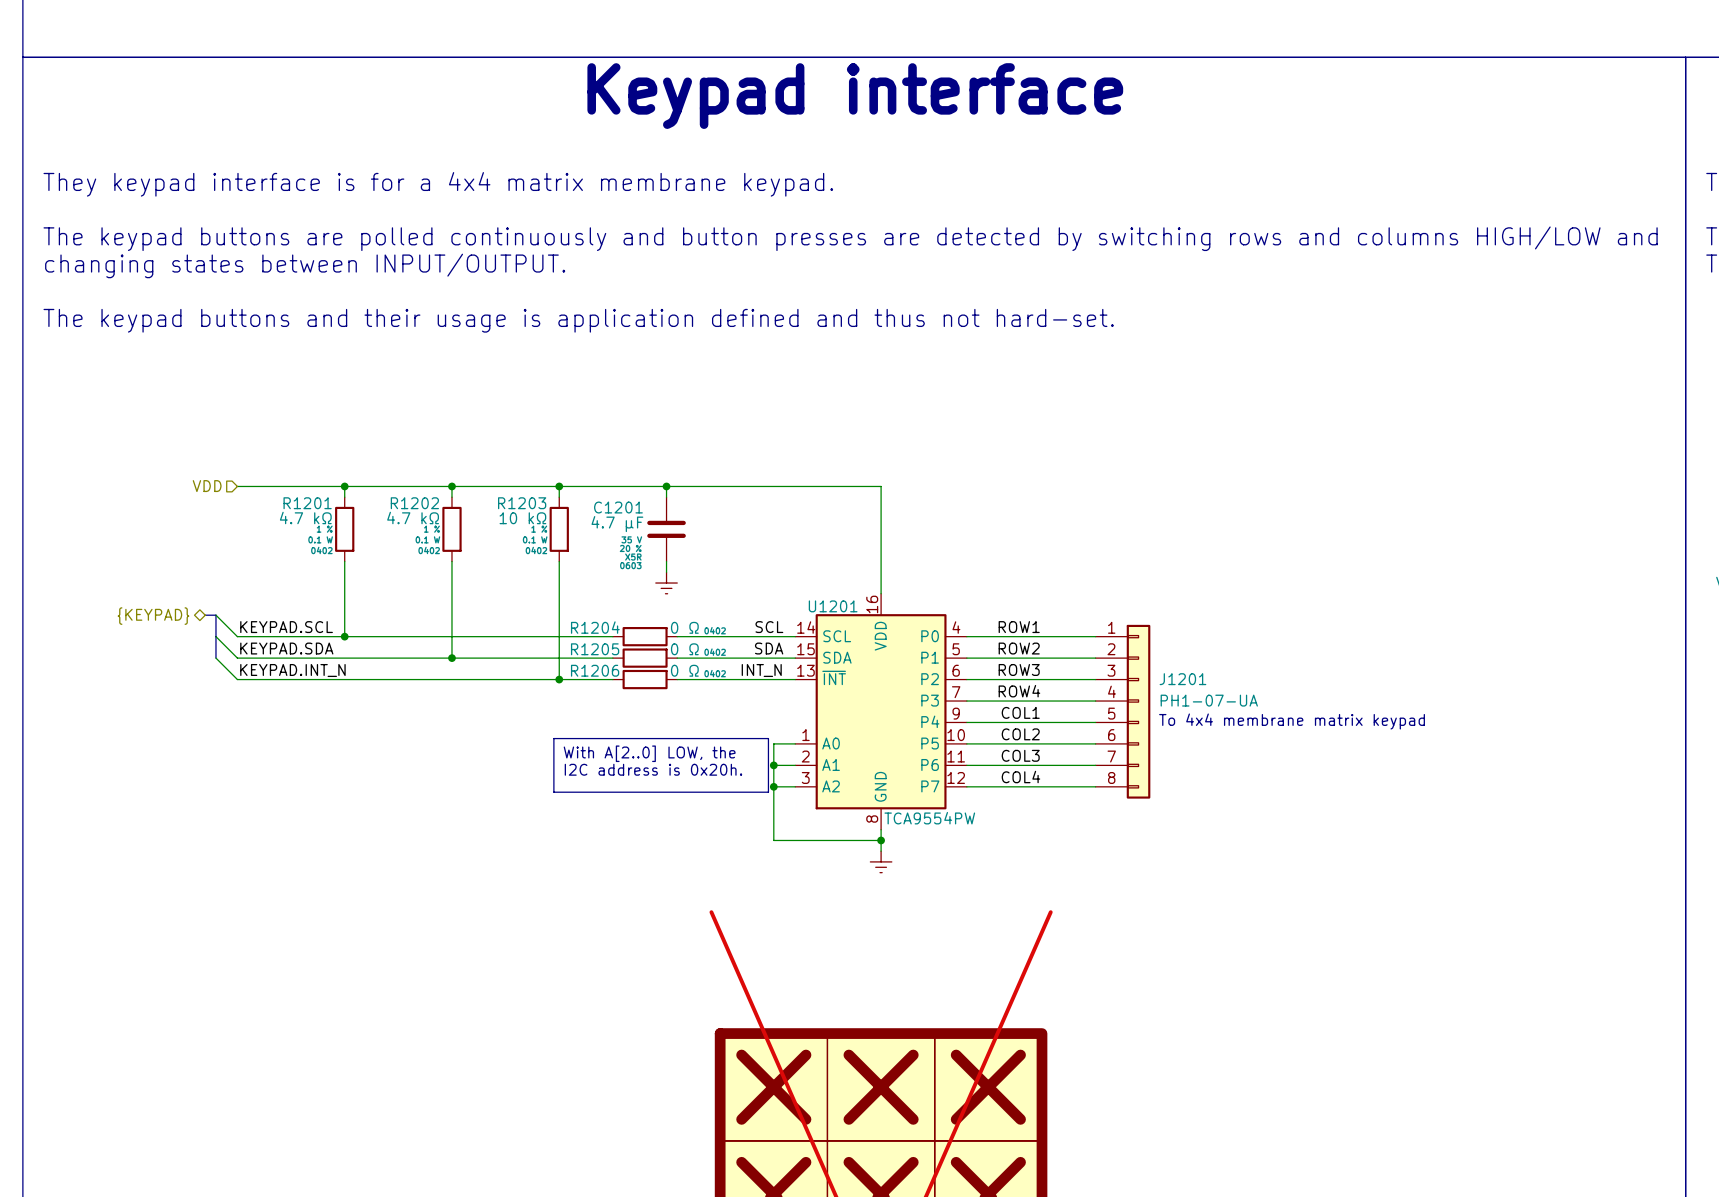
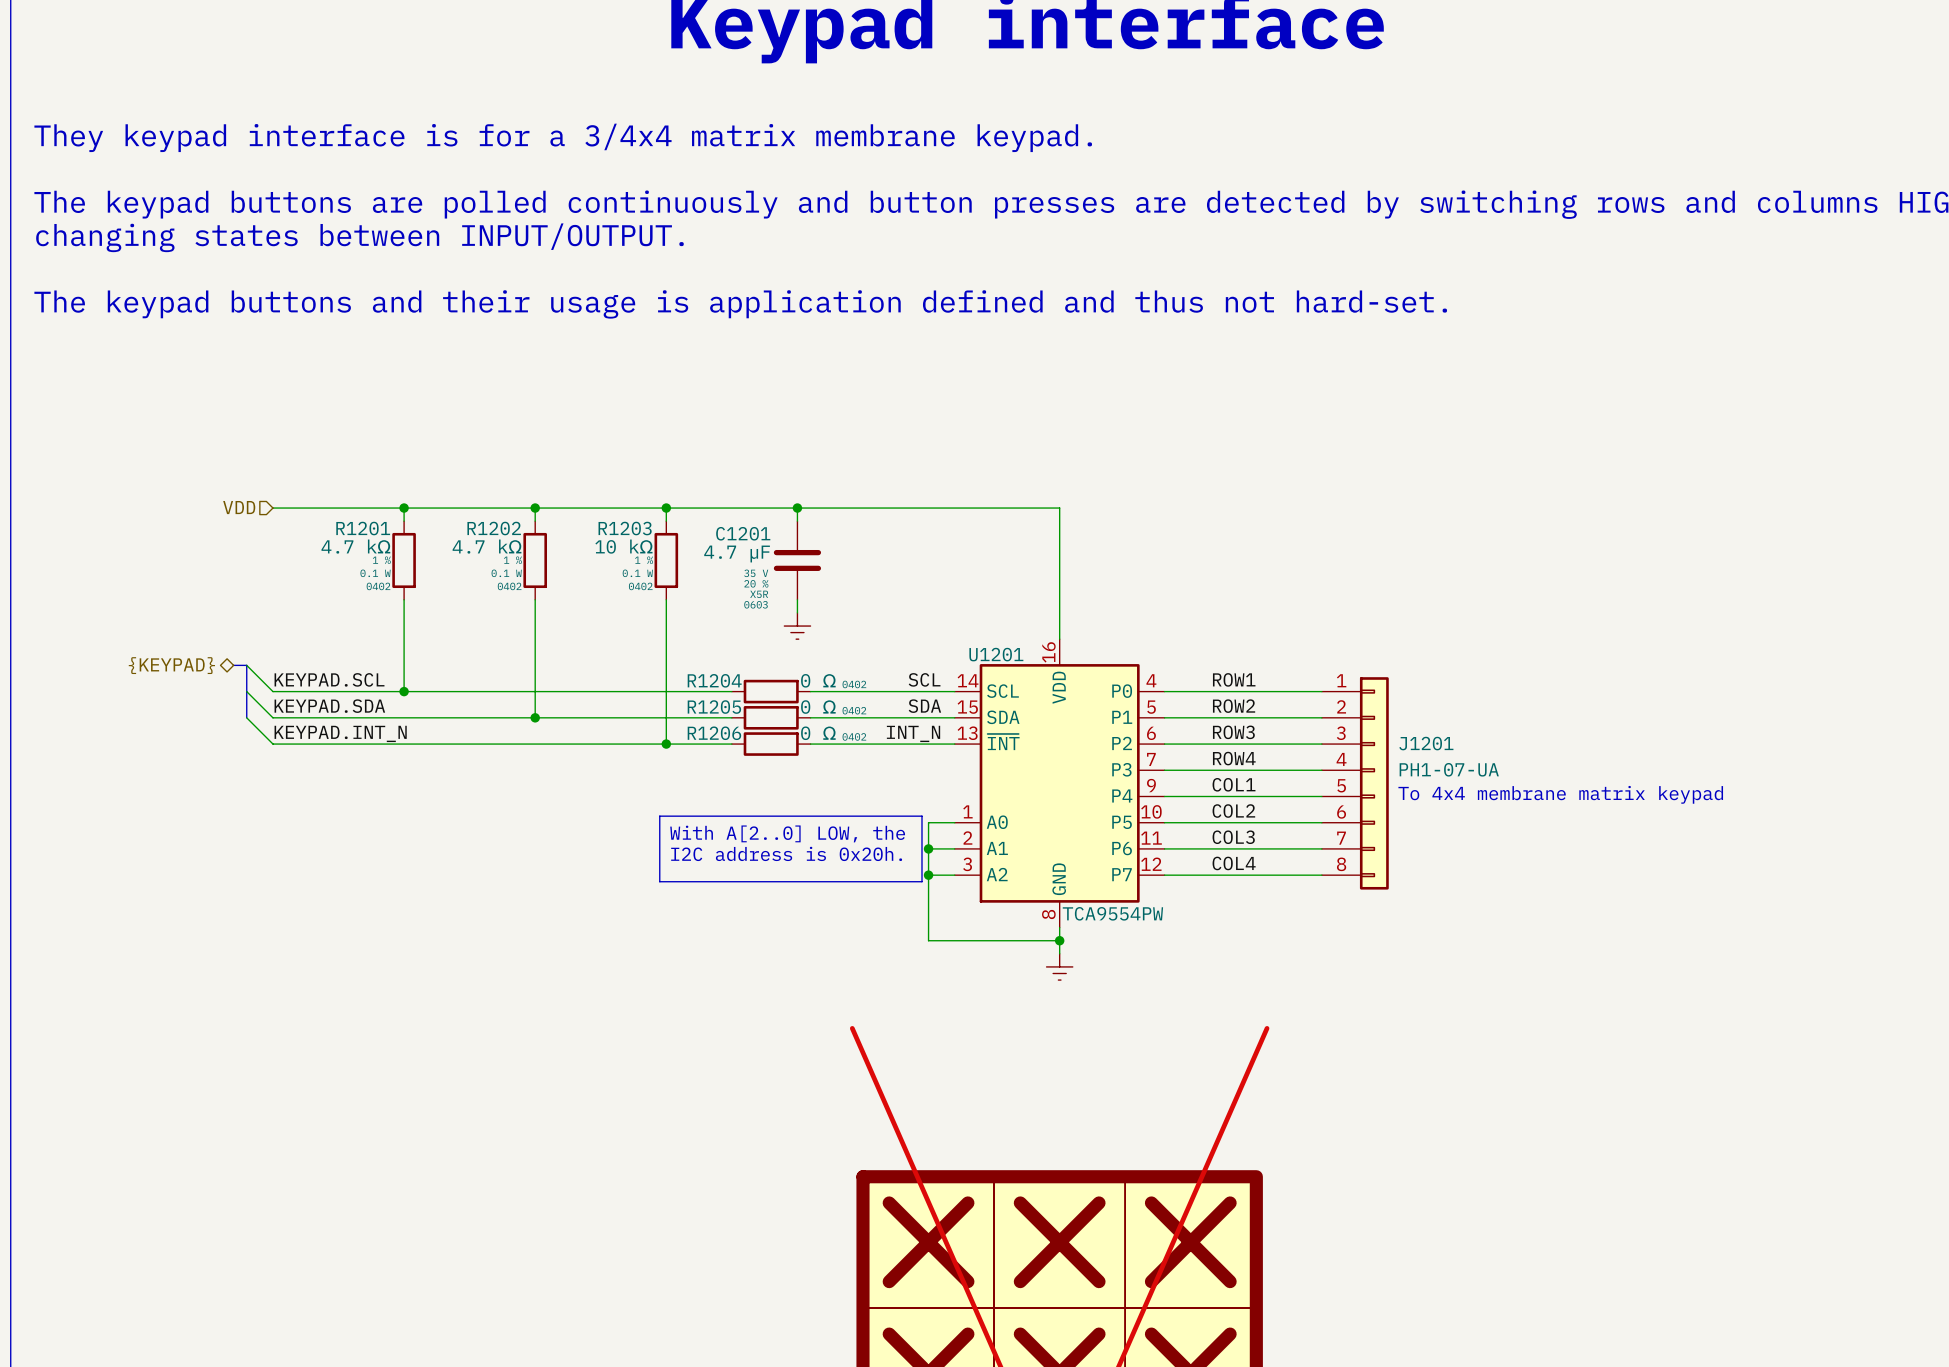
text: They keypad interface is for a 4x4 matrix membrane keypad. (438, 184) -> They keypad interface is for a 3/4x4 matrix membrane keypad. (563, 137)

